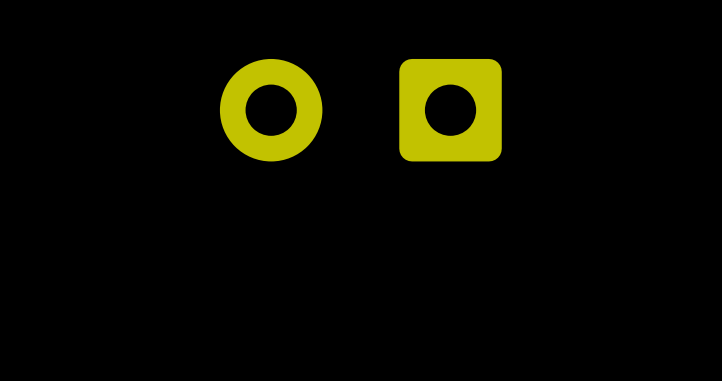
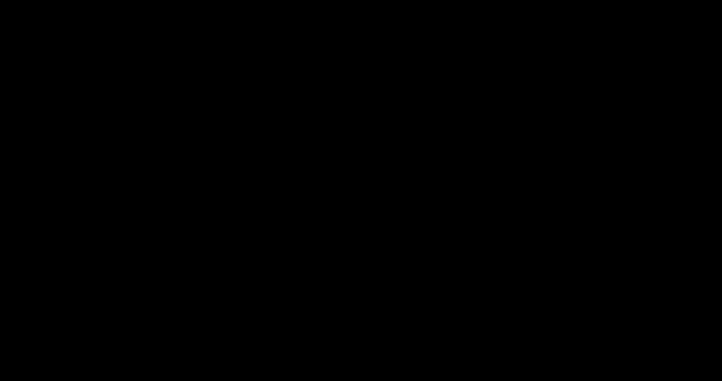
part: (360, 110) -> none

